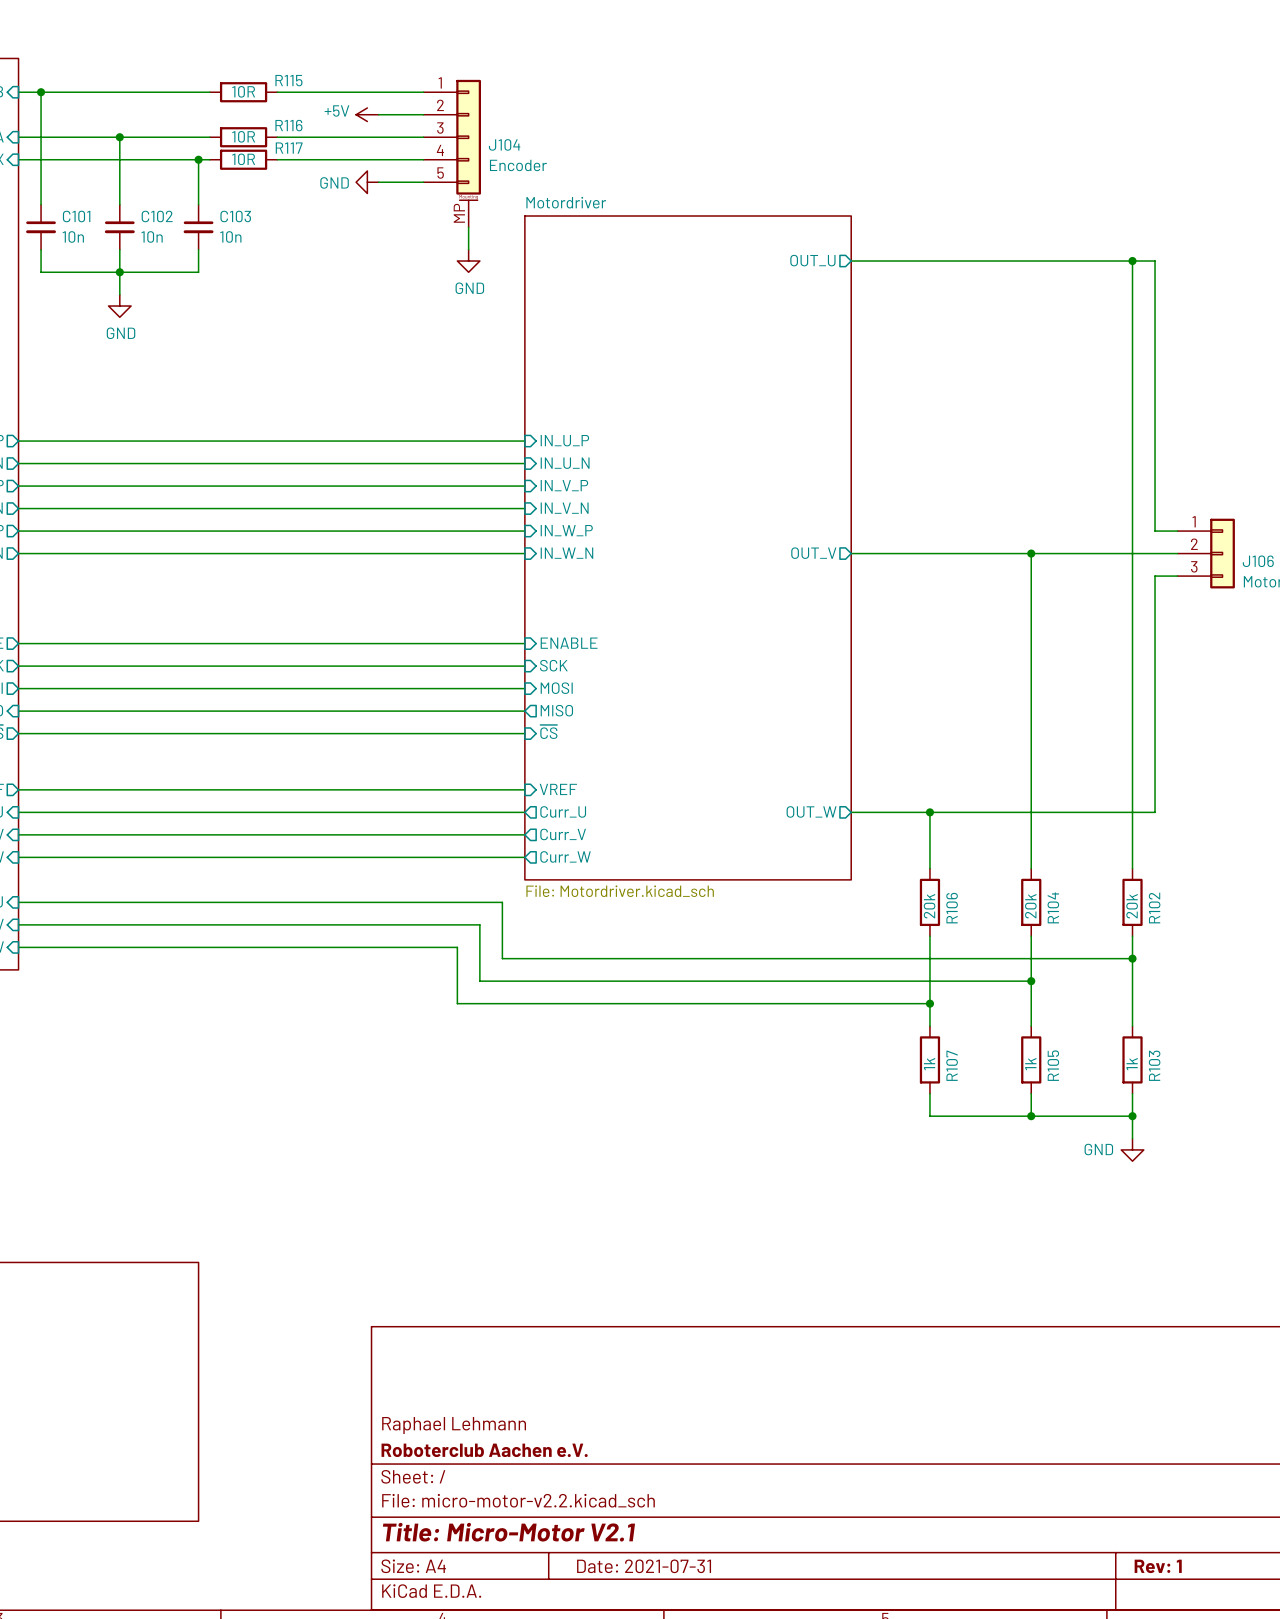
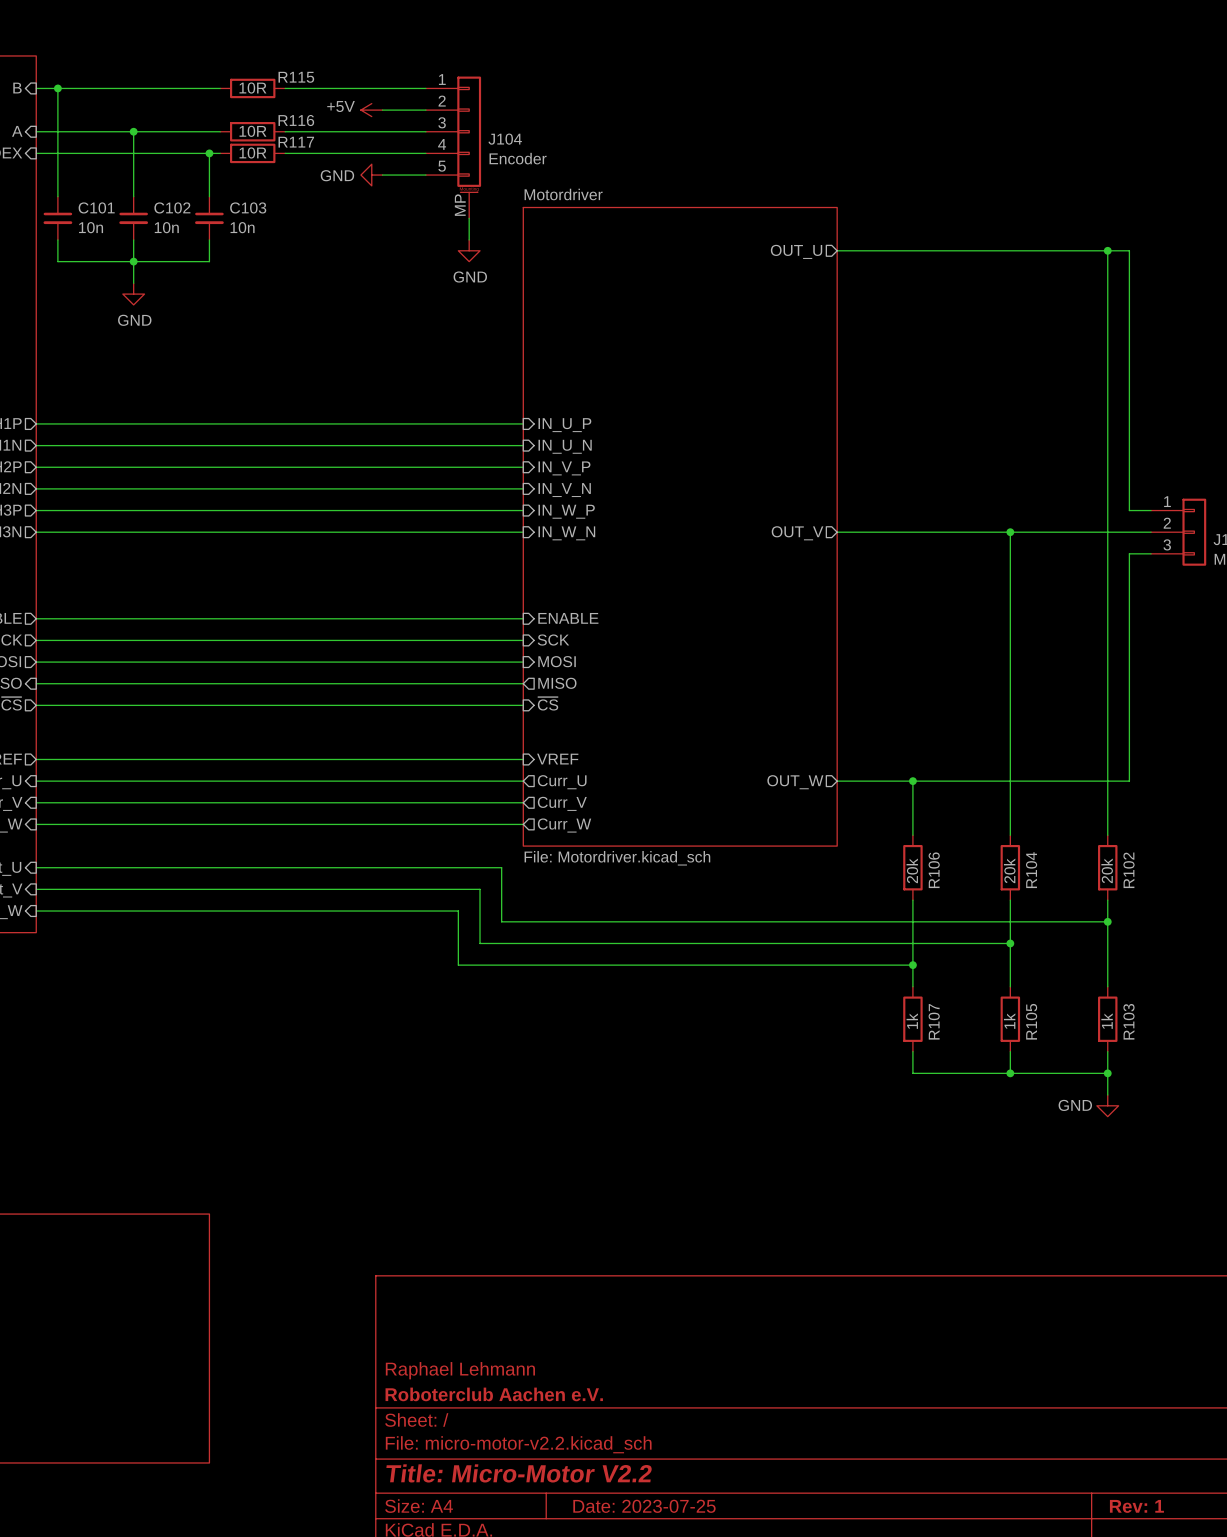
title block: Title: Micro-Motor V2.1 (508, 1532) -> Title: Micro-Motor V2.2 (519, 1473)
title block: Date: 2021-07-31 (644, 1566) -> Date: 2023-07-25 (644, 1506)

